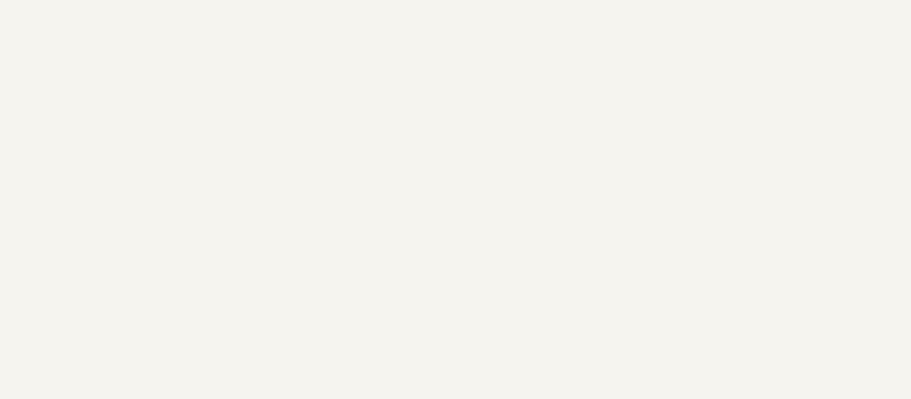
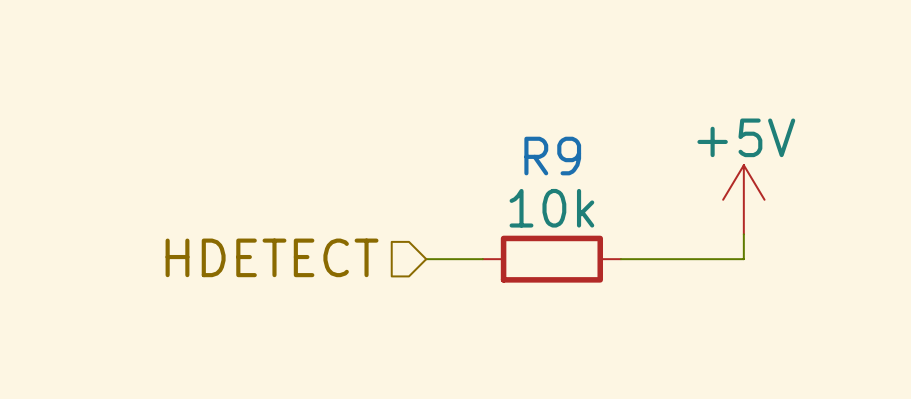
power symbol: none -> +5V (743, 199)
wire: none -> (743, 234) (743, 259) (620, 259)
hierarchical label: none -> HDETECT (272, 257)
wire: none -> (426, 259) (482, 259)
R9: none -> 10k (551, 259)

